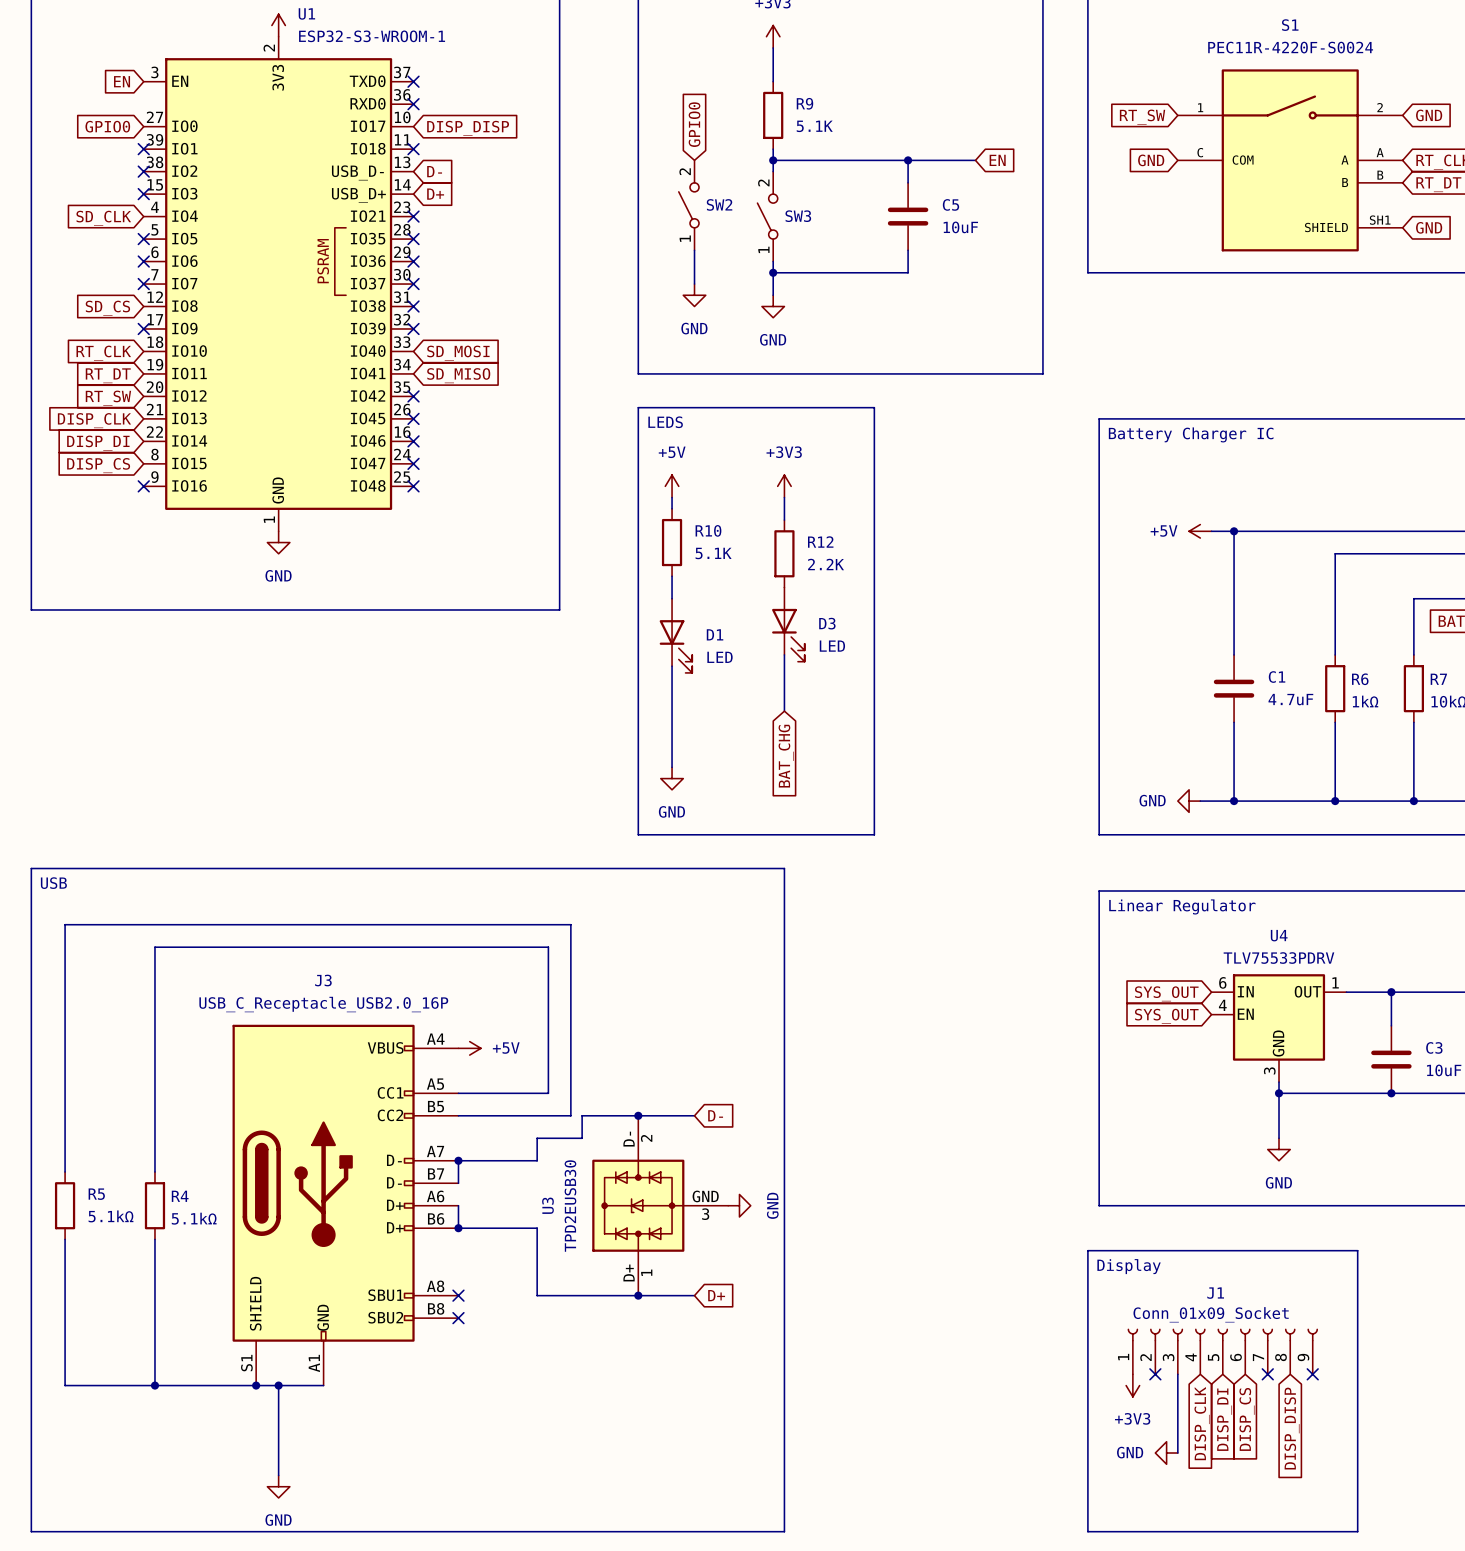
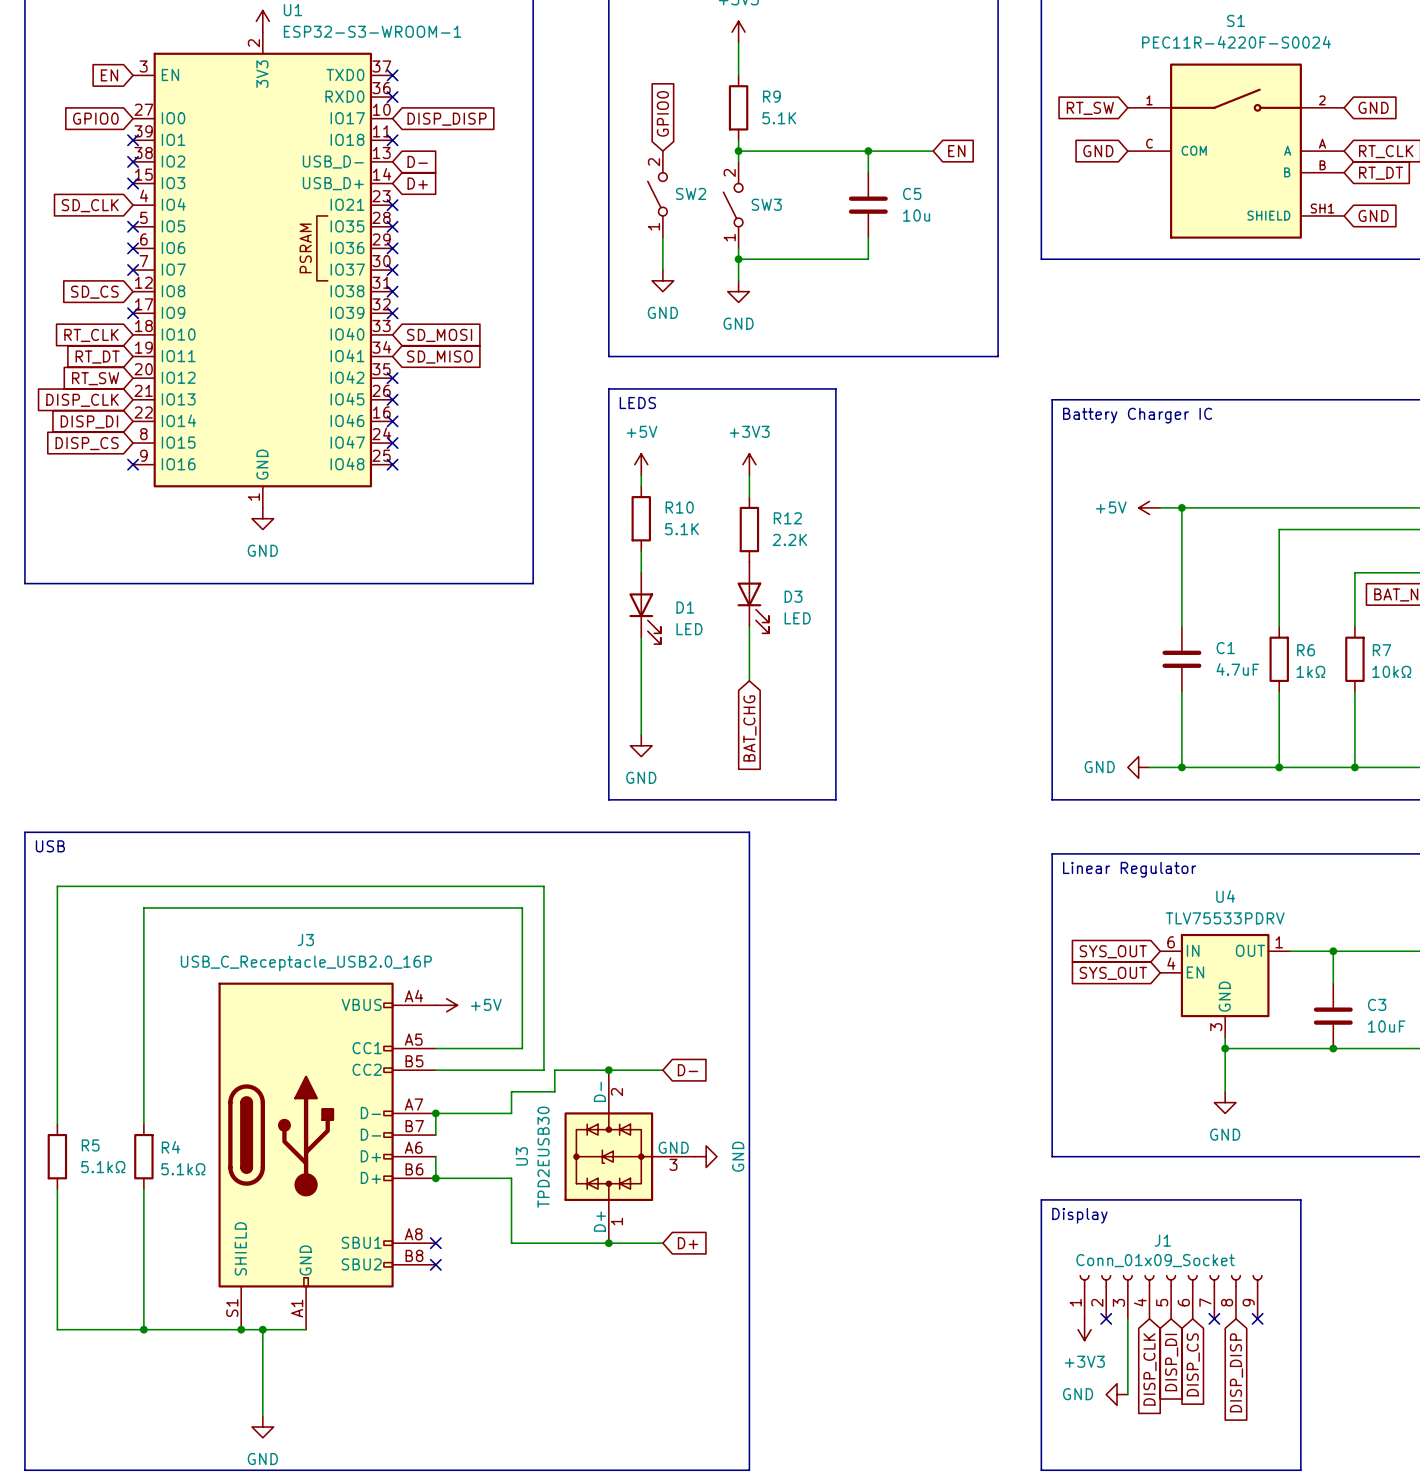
C5 value: 10uF (960, 227) -> 10u (916, 215)

